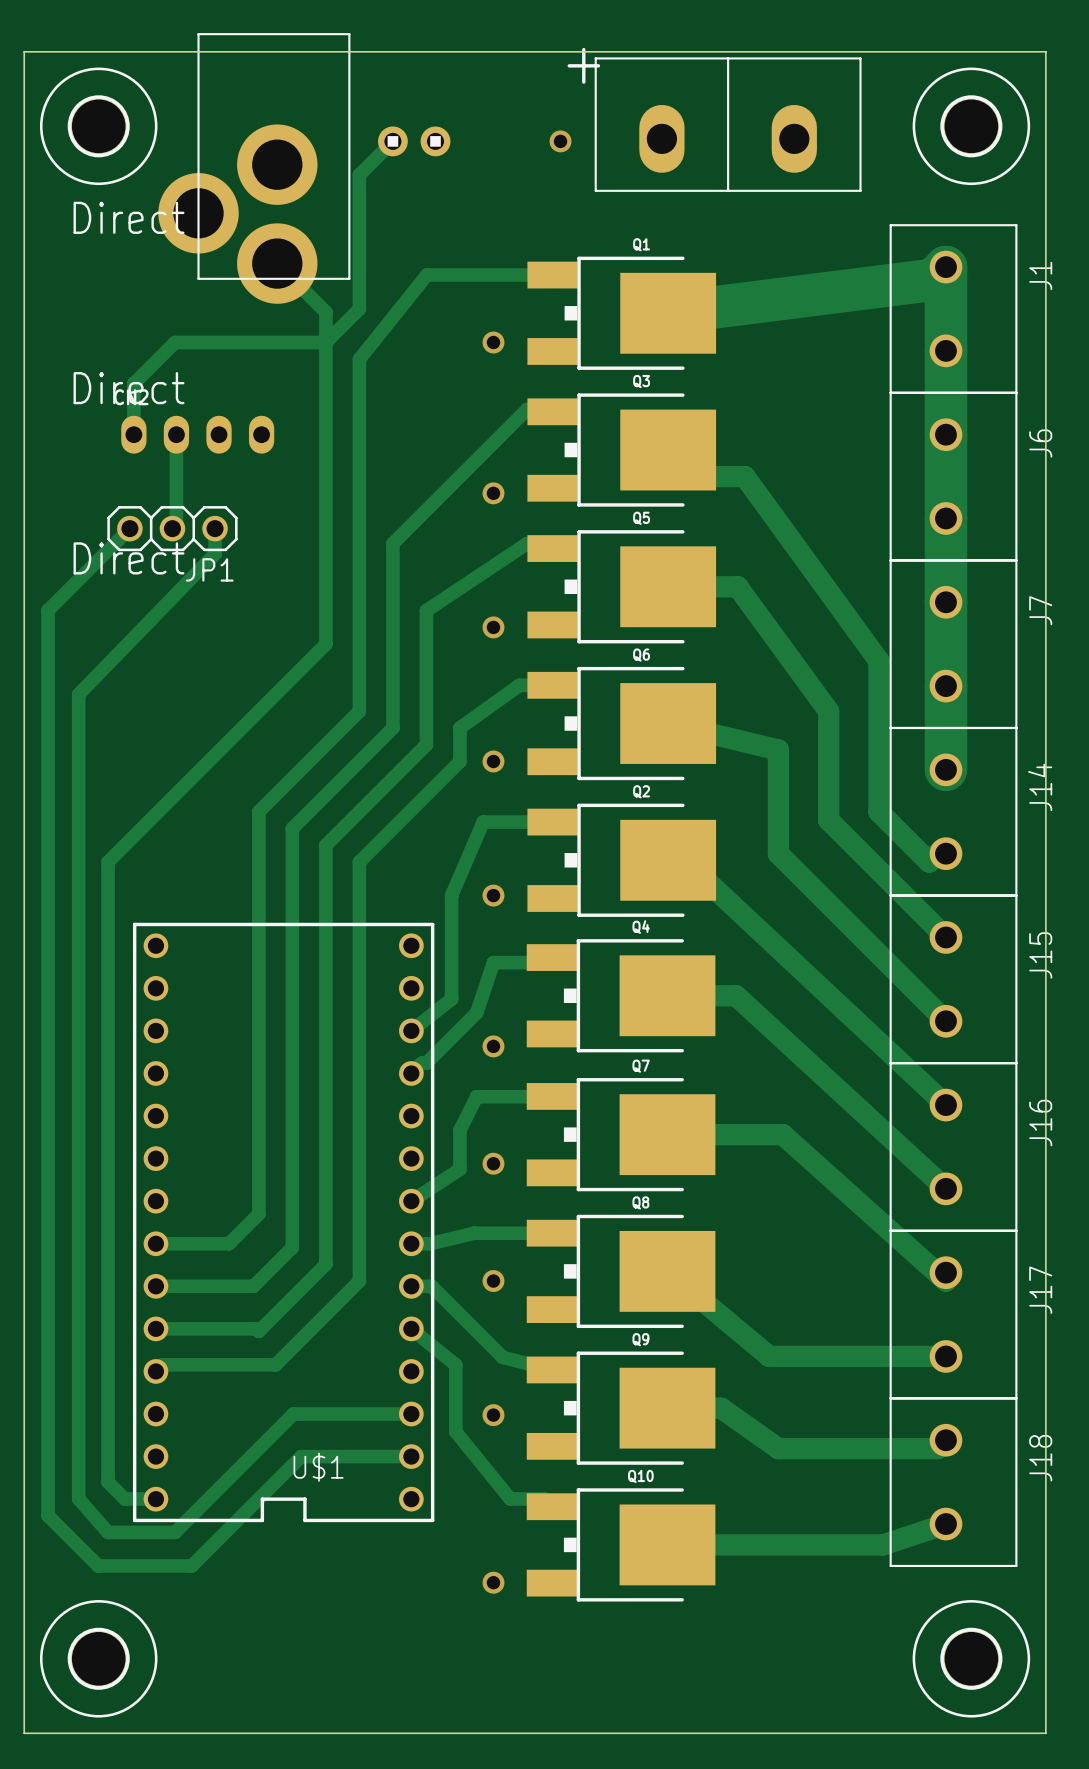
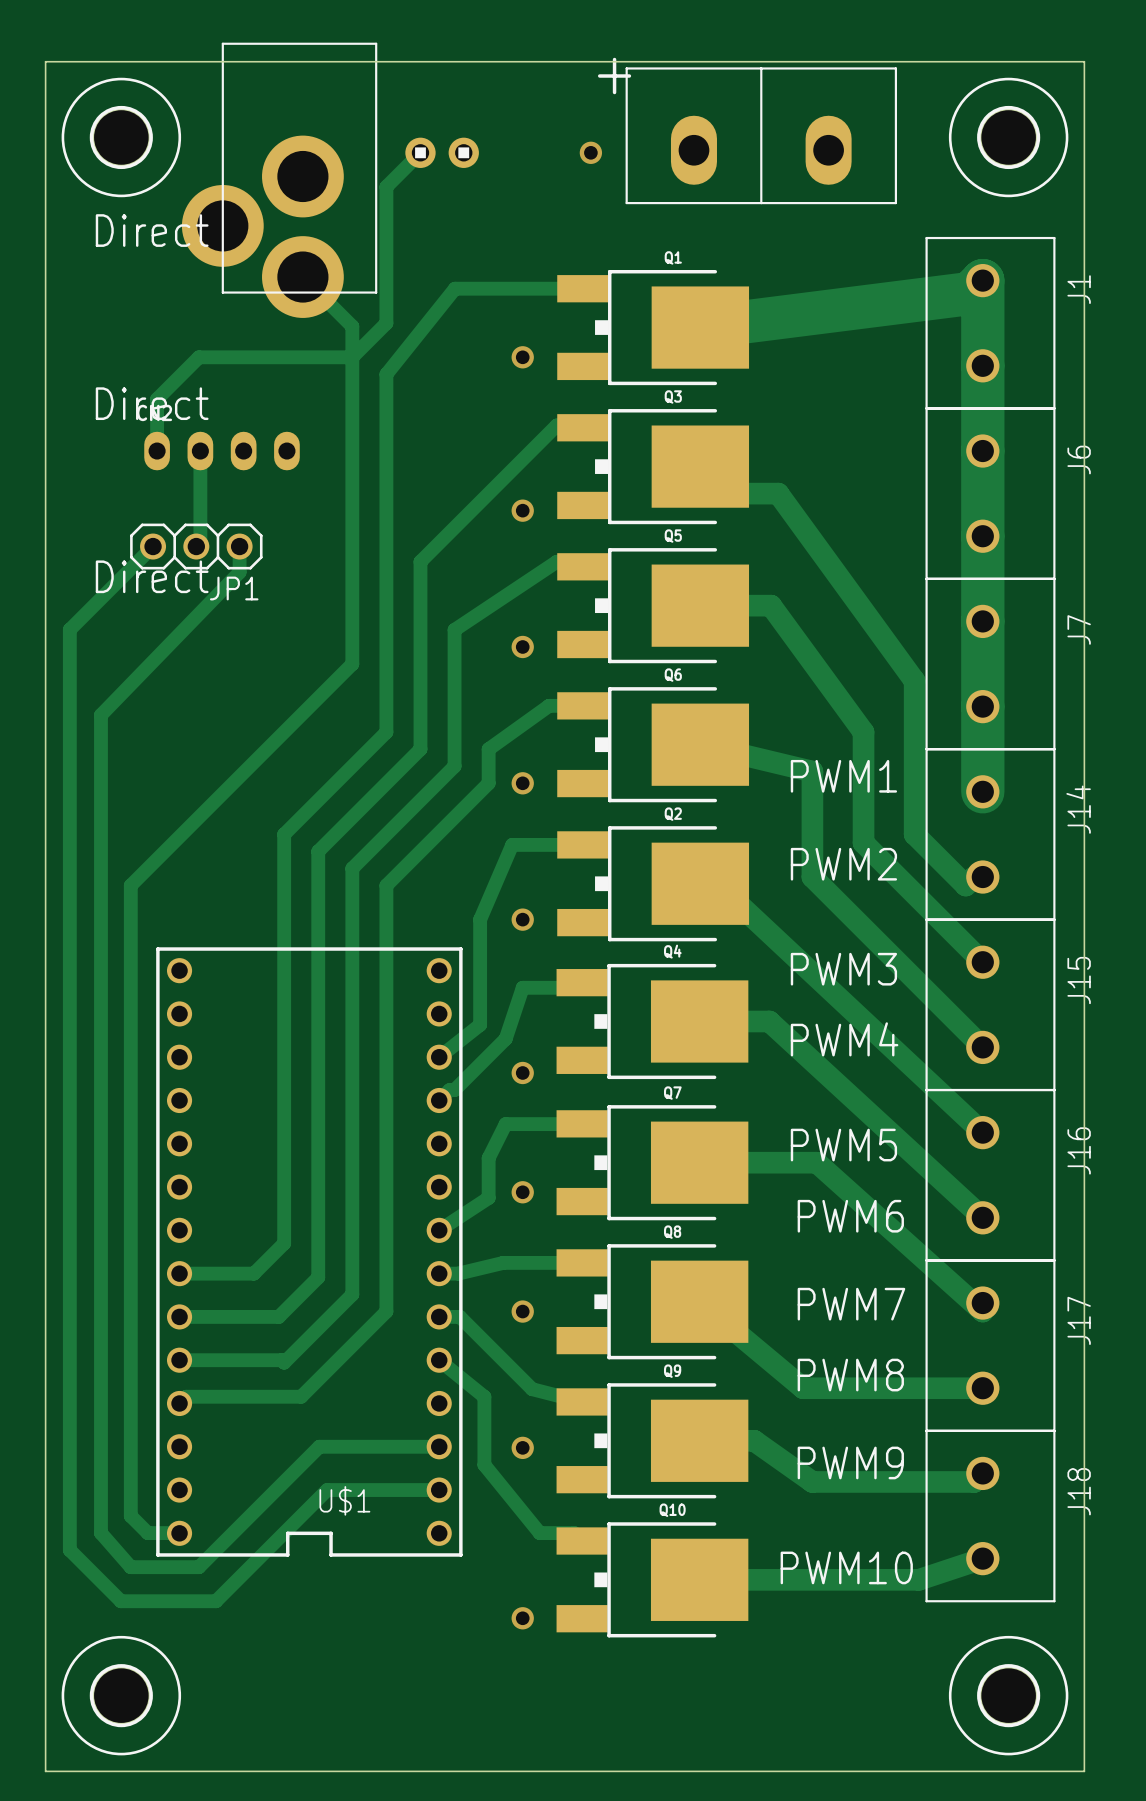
text: none -> PWM1 (843, 776)
text: none -> PWM2 (843, 864)
text: none -> PWM3 (843, 969)
text: none -> PWM4 (844, 1039)
text: none -> PWM5 (843, 1145)
text: none -> PWM6 (850, 1216)
text: none -> PWM7 (851, 1304)
text: none -> PWM8 (850, 1375)
text: none -> PWM9 (850, 1462)
text: none -> PWM10 (846, 1567)

